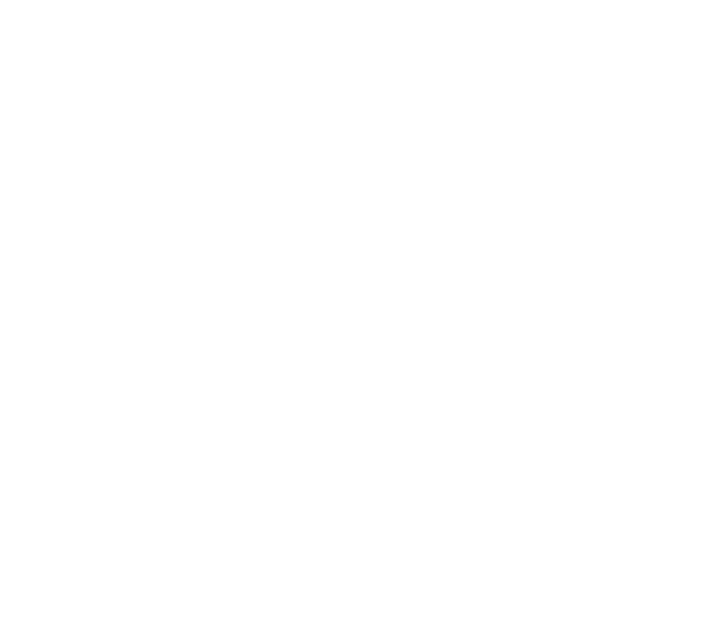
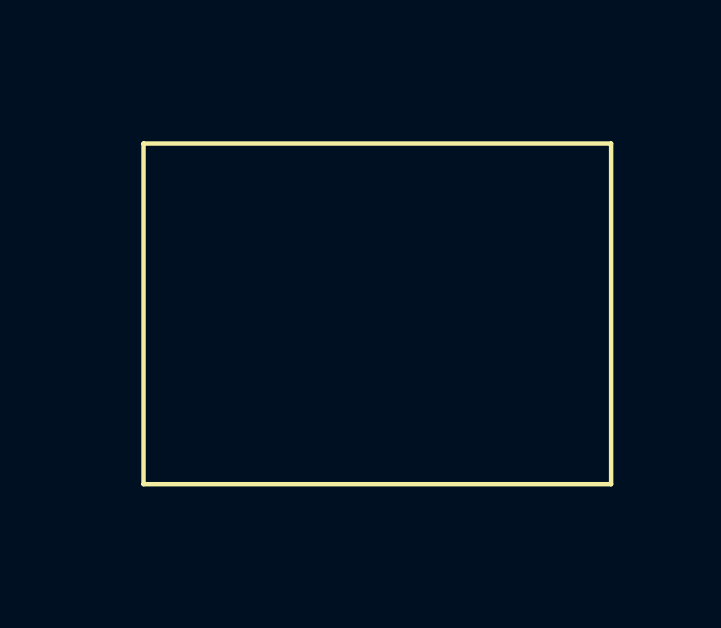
line: none -> (143, 143) (611, 143) (611, 484) (143, 484) (143, 143)

